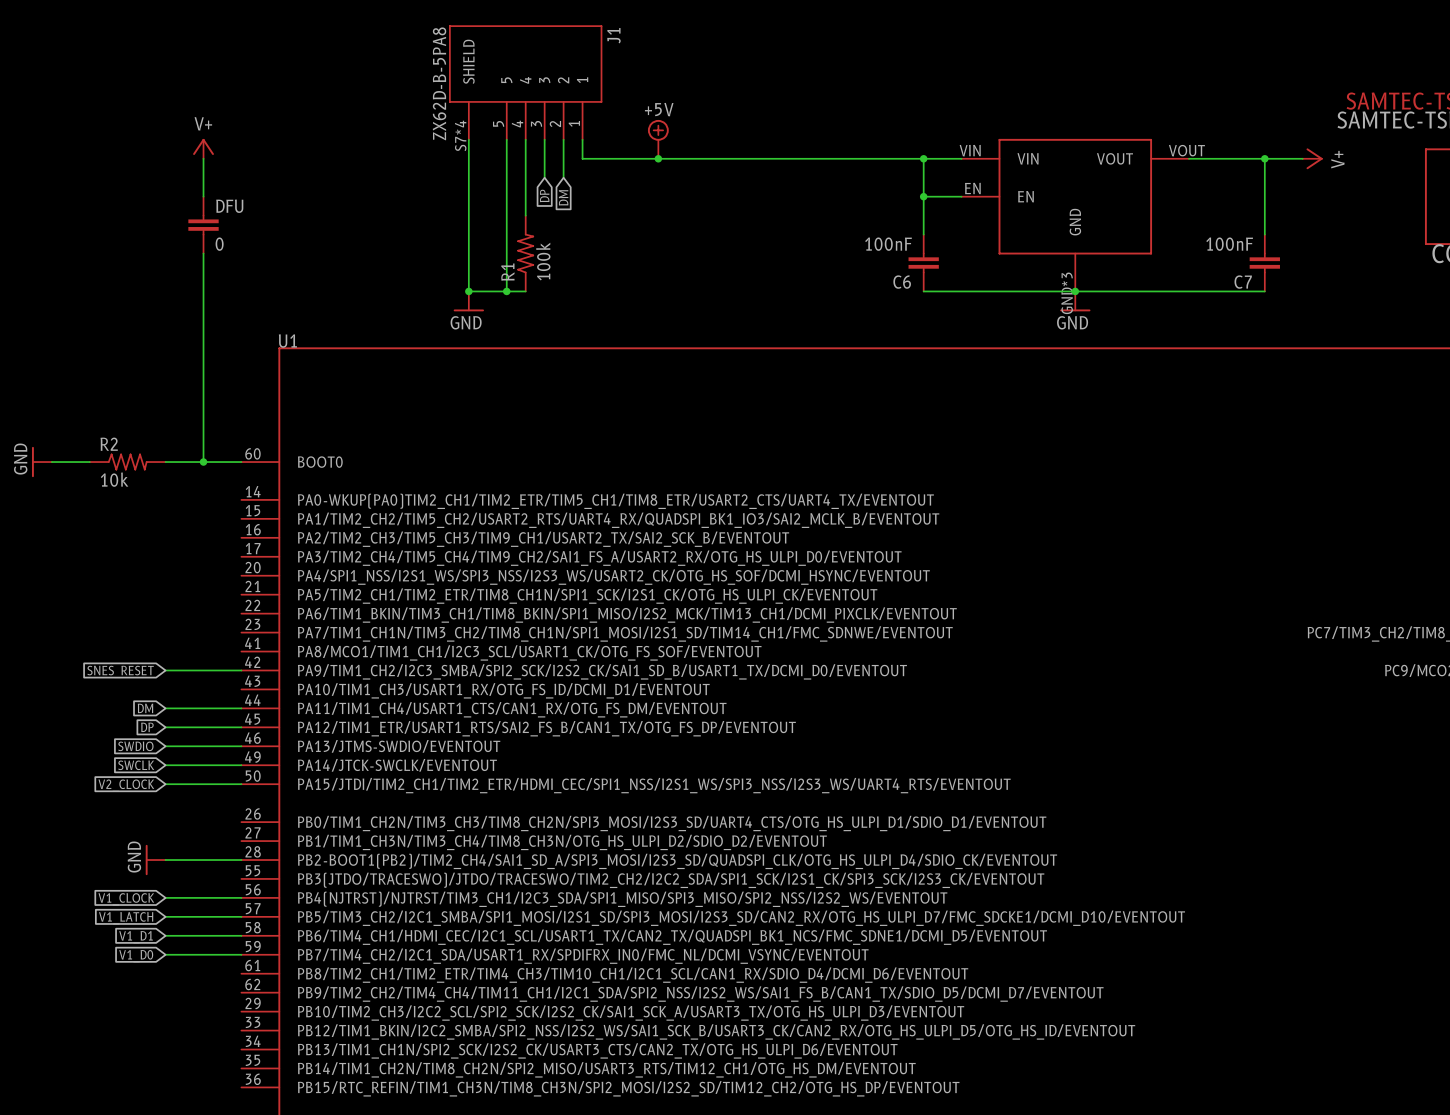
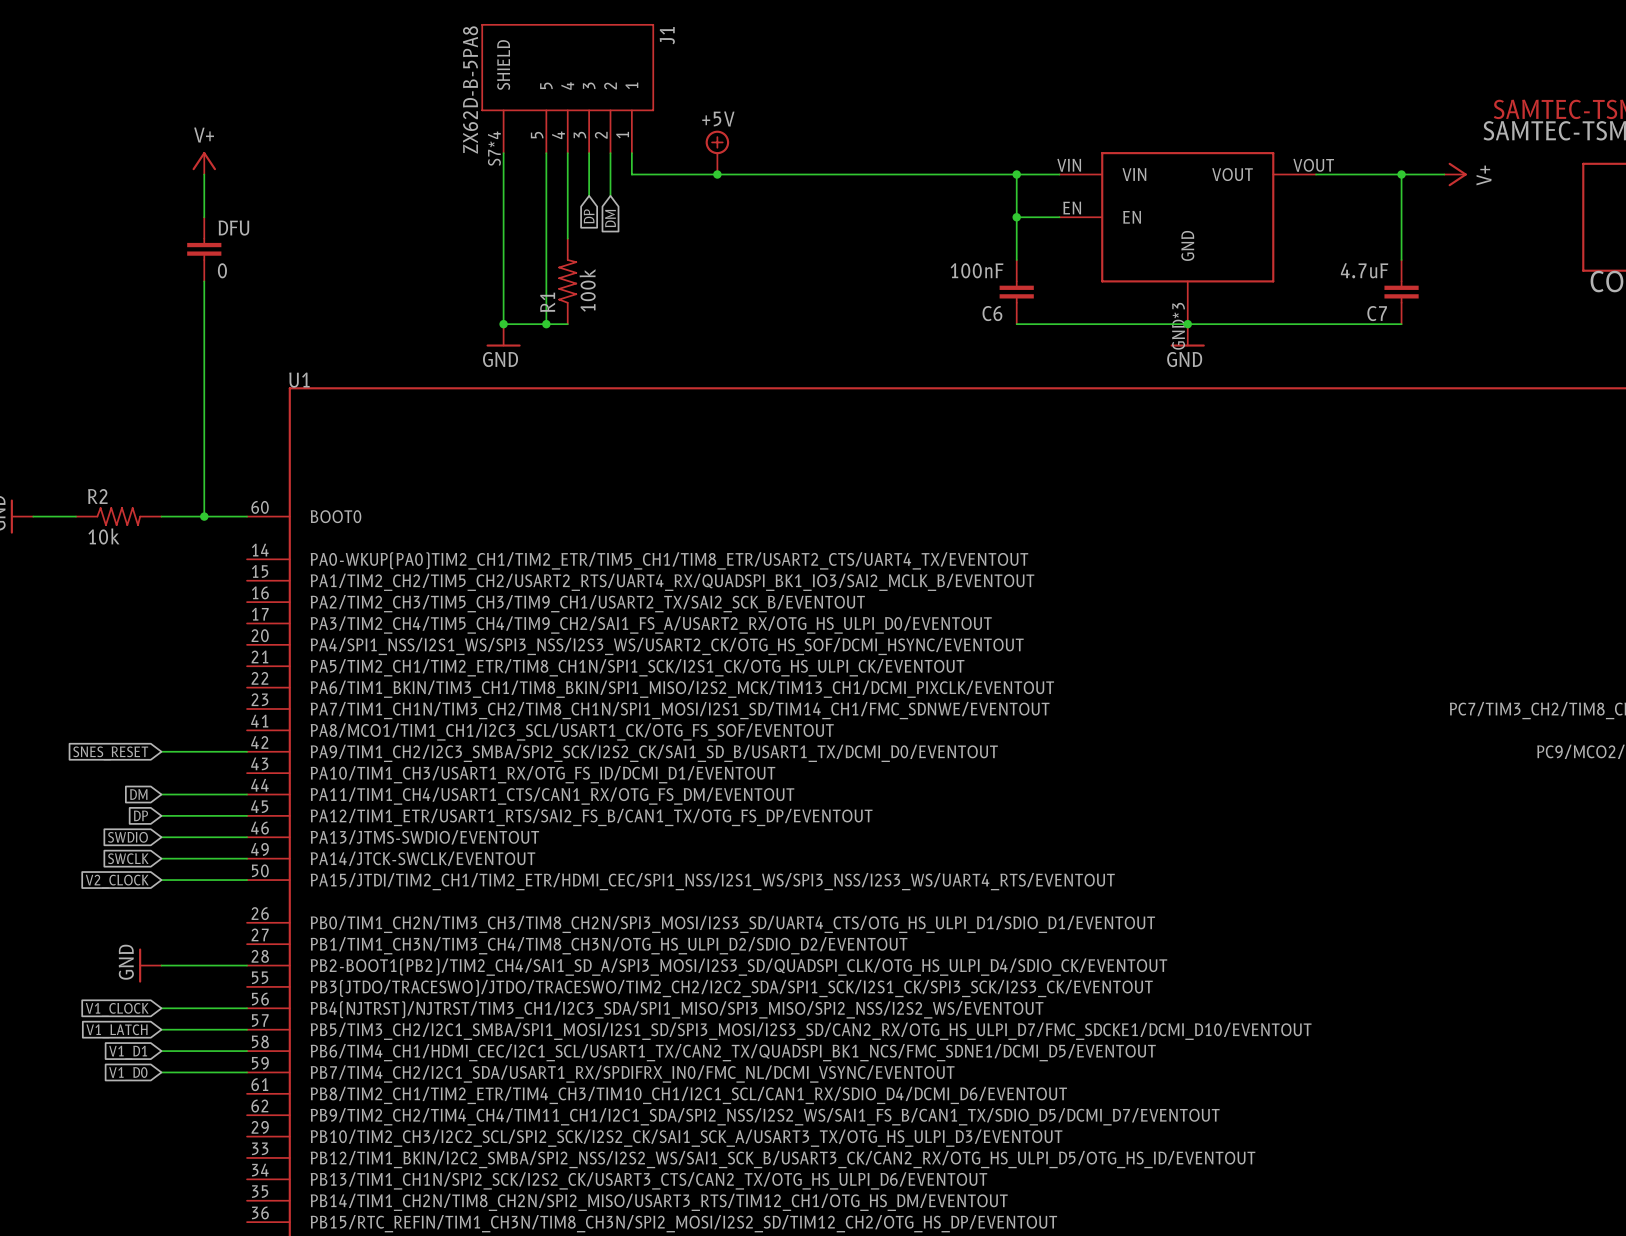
C7 value: 100nF (1229, 244) -> 4.7uF (1364, 270)

